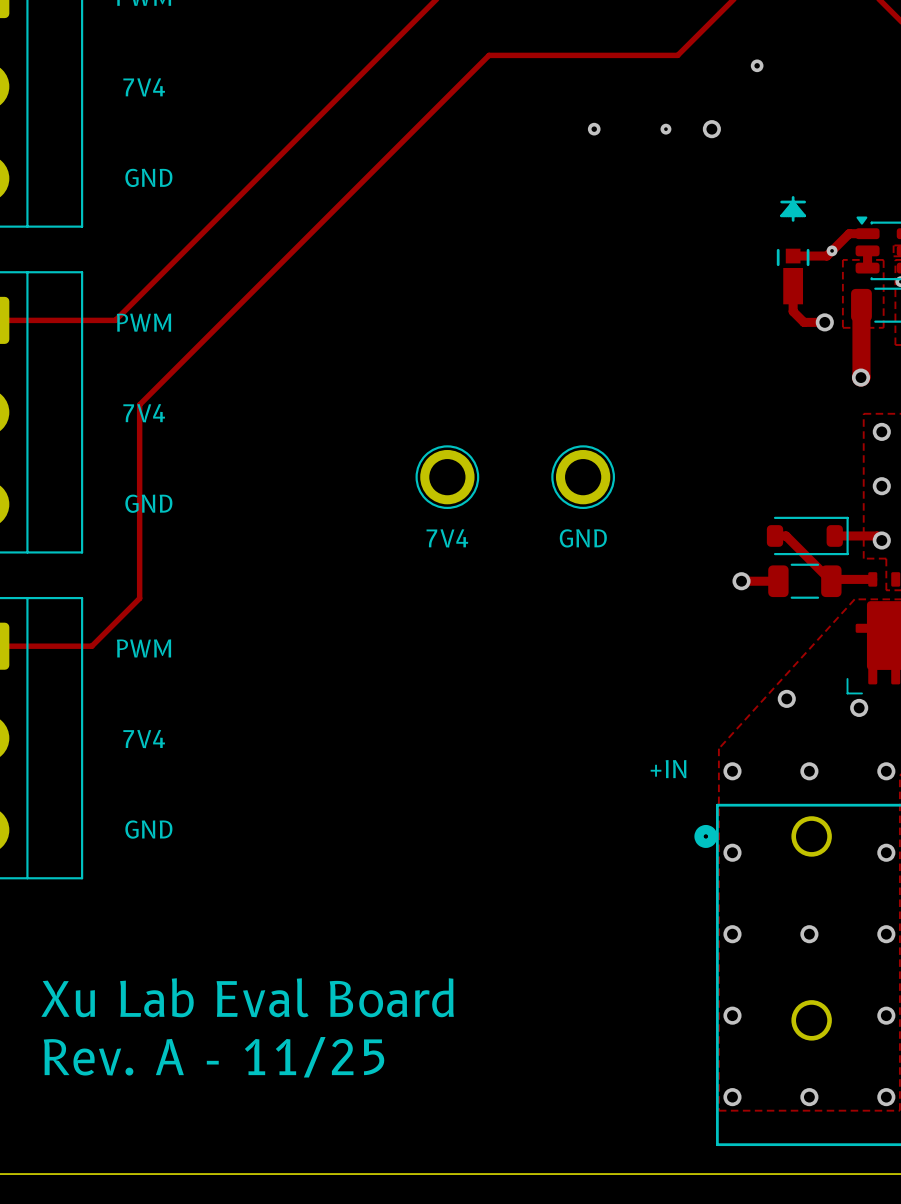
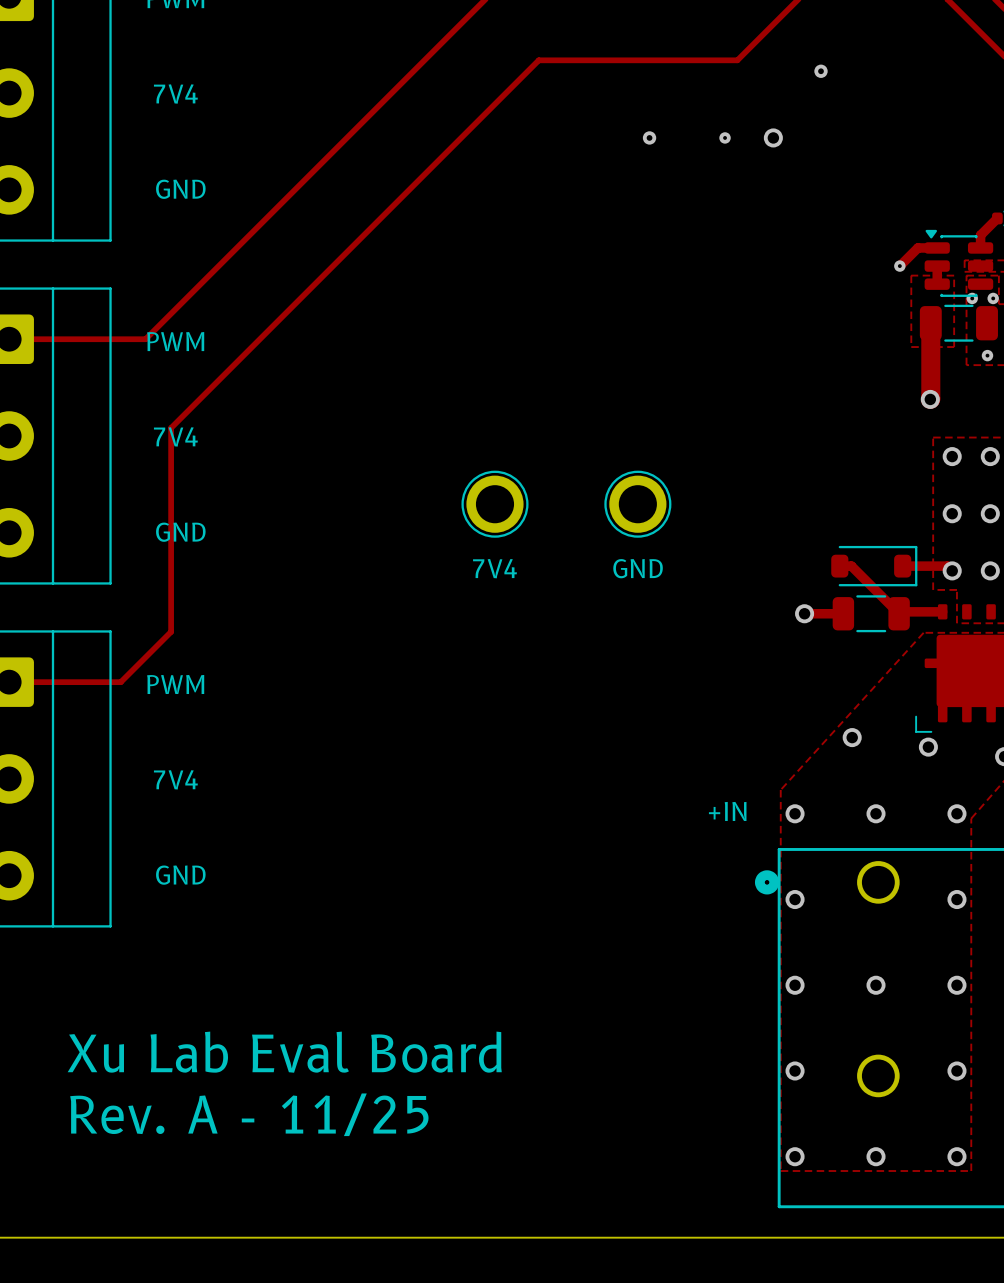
part: (793, 250) -> none
track: (832, 250) (826, 256) (793, 256) -> none
track: (793, 286) (793, 311) (803, 322) (824, 322) -> none
via: (824, 322) -> none

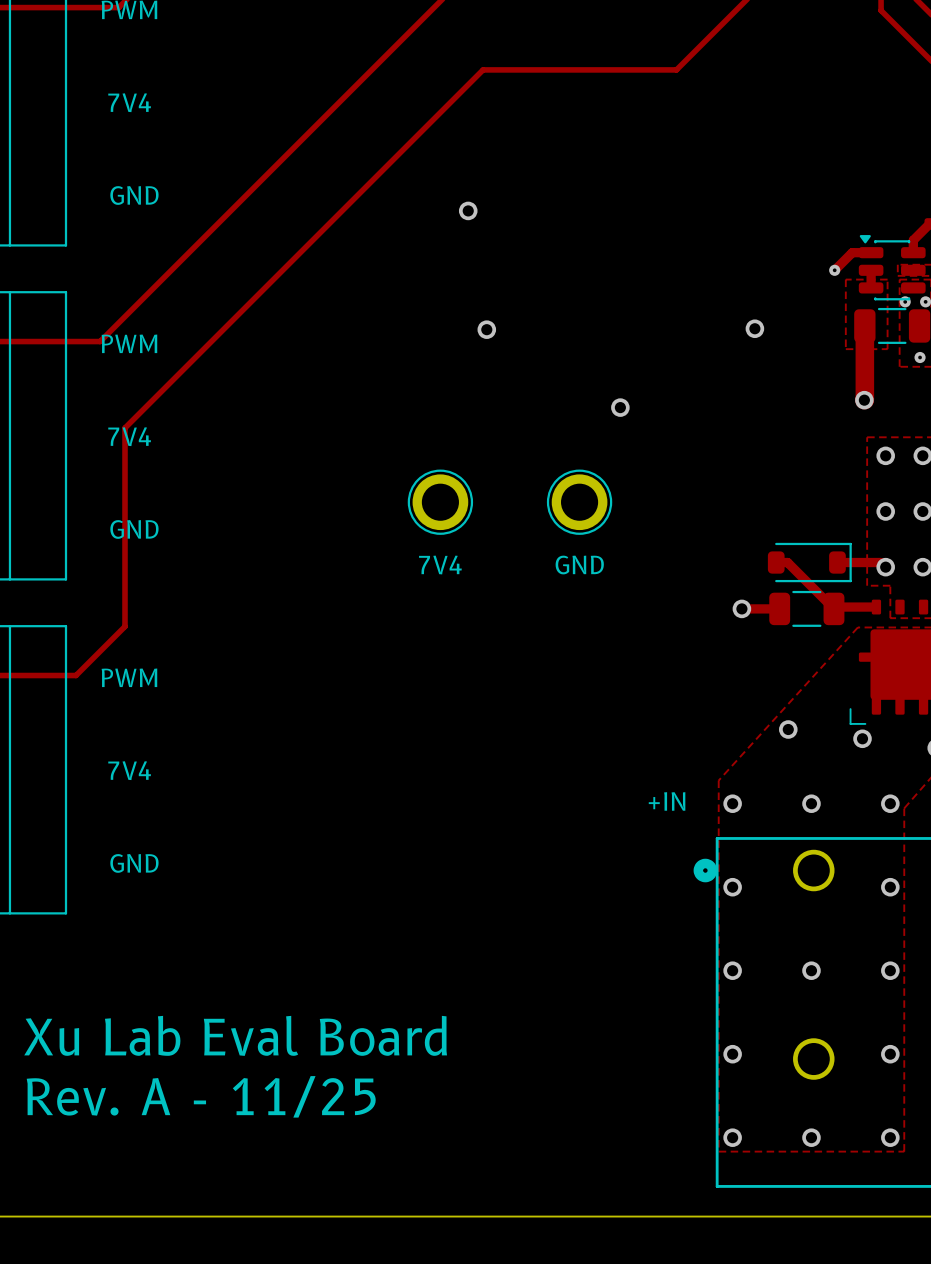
via: (821, 71) -> none
via: (649, 137) -> none
via: (725, 137) -> none
via: (773, 137) -> none
via: none -> (468, 210)
via: none -> (754, 328)
via: none -> (486, 329)
via: none -> (620, 407)

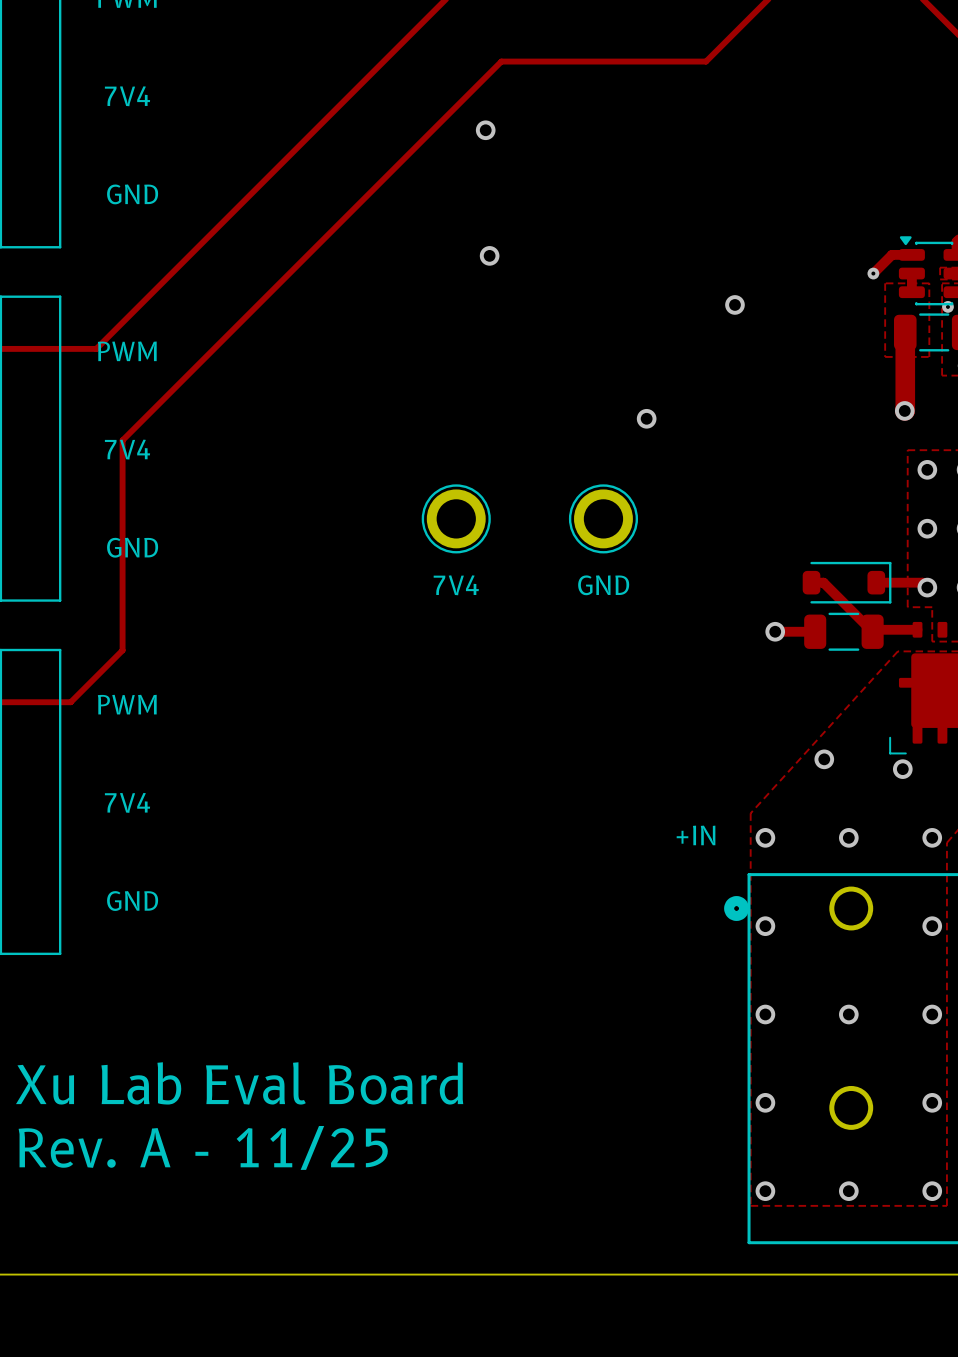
via: none -> (485, 130)
via: (468, 210) -> none
via: none -> (489, 255)
via position: (754, 328) -> (734, 304)
via: (486, 329) -> none

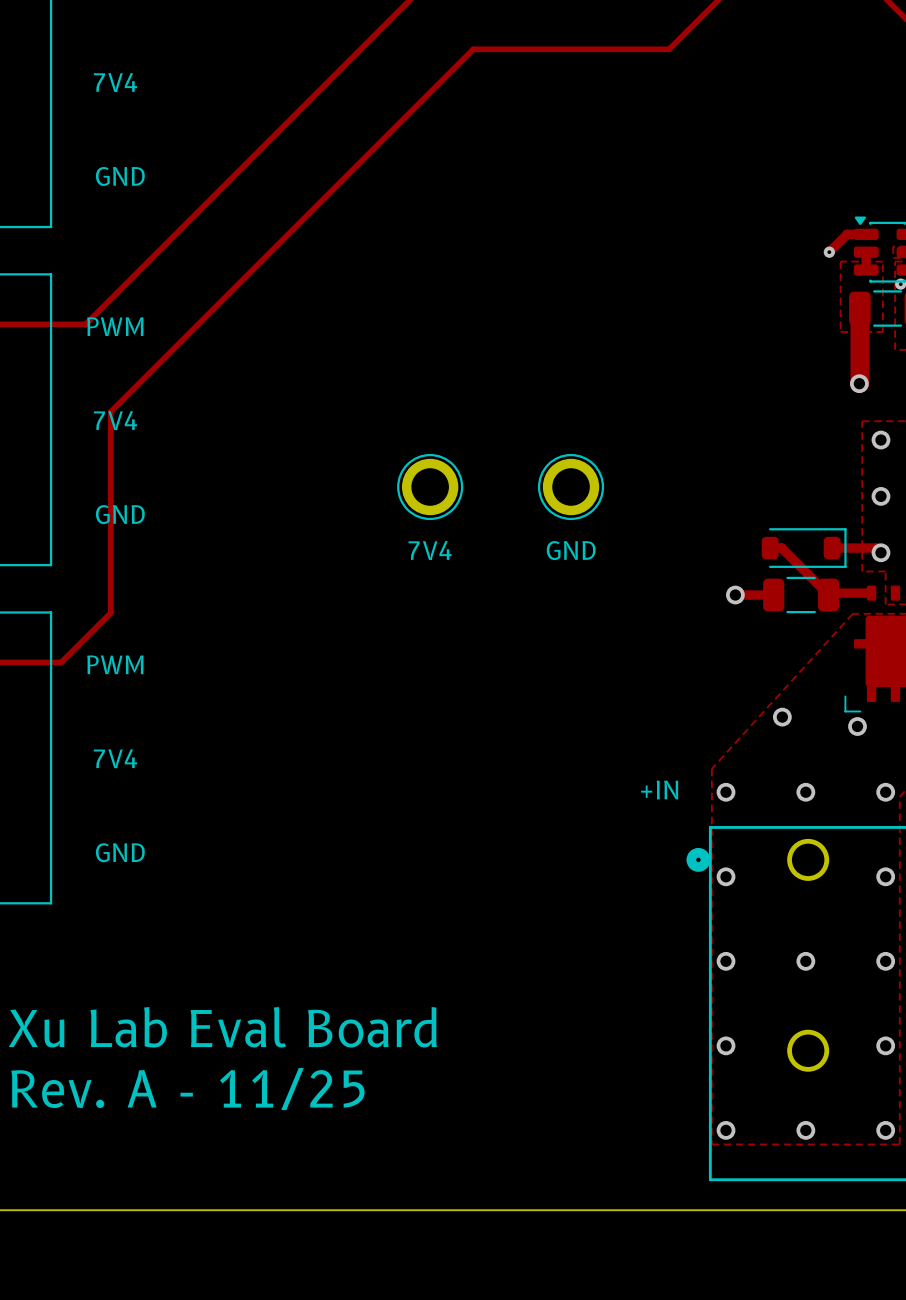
via: (485, 130) -> none
via: (489, 255) -> none
via: (734, 304) -> none
via: (646, 418) -> none

